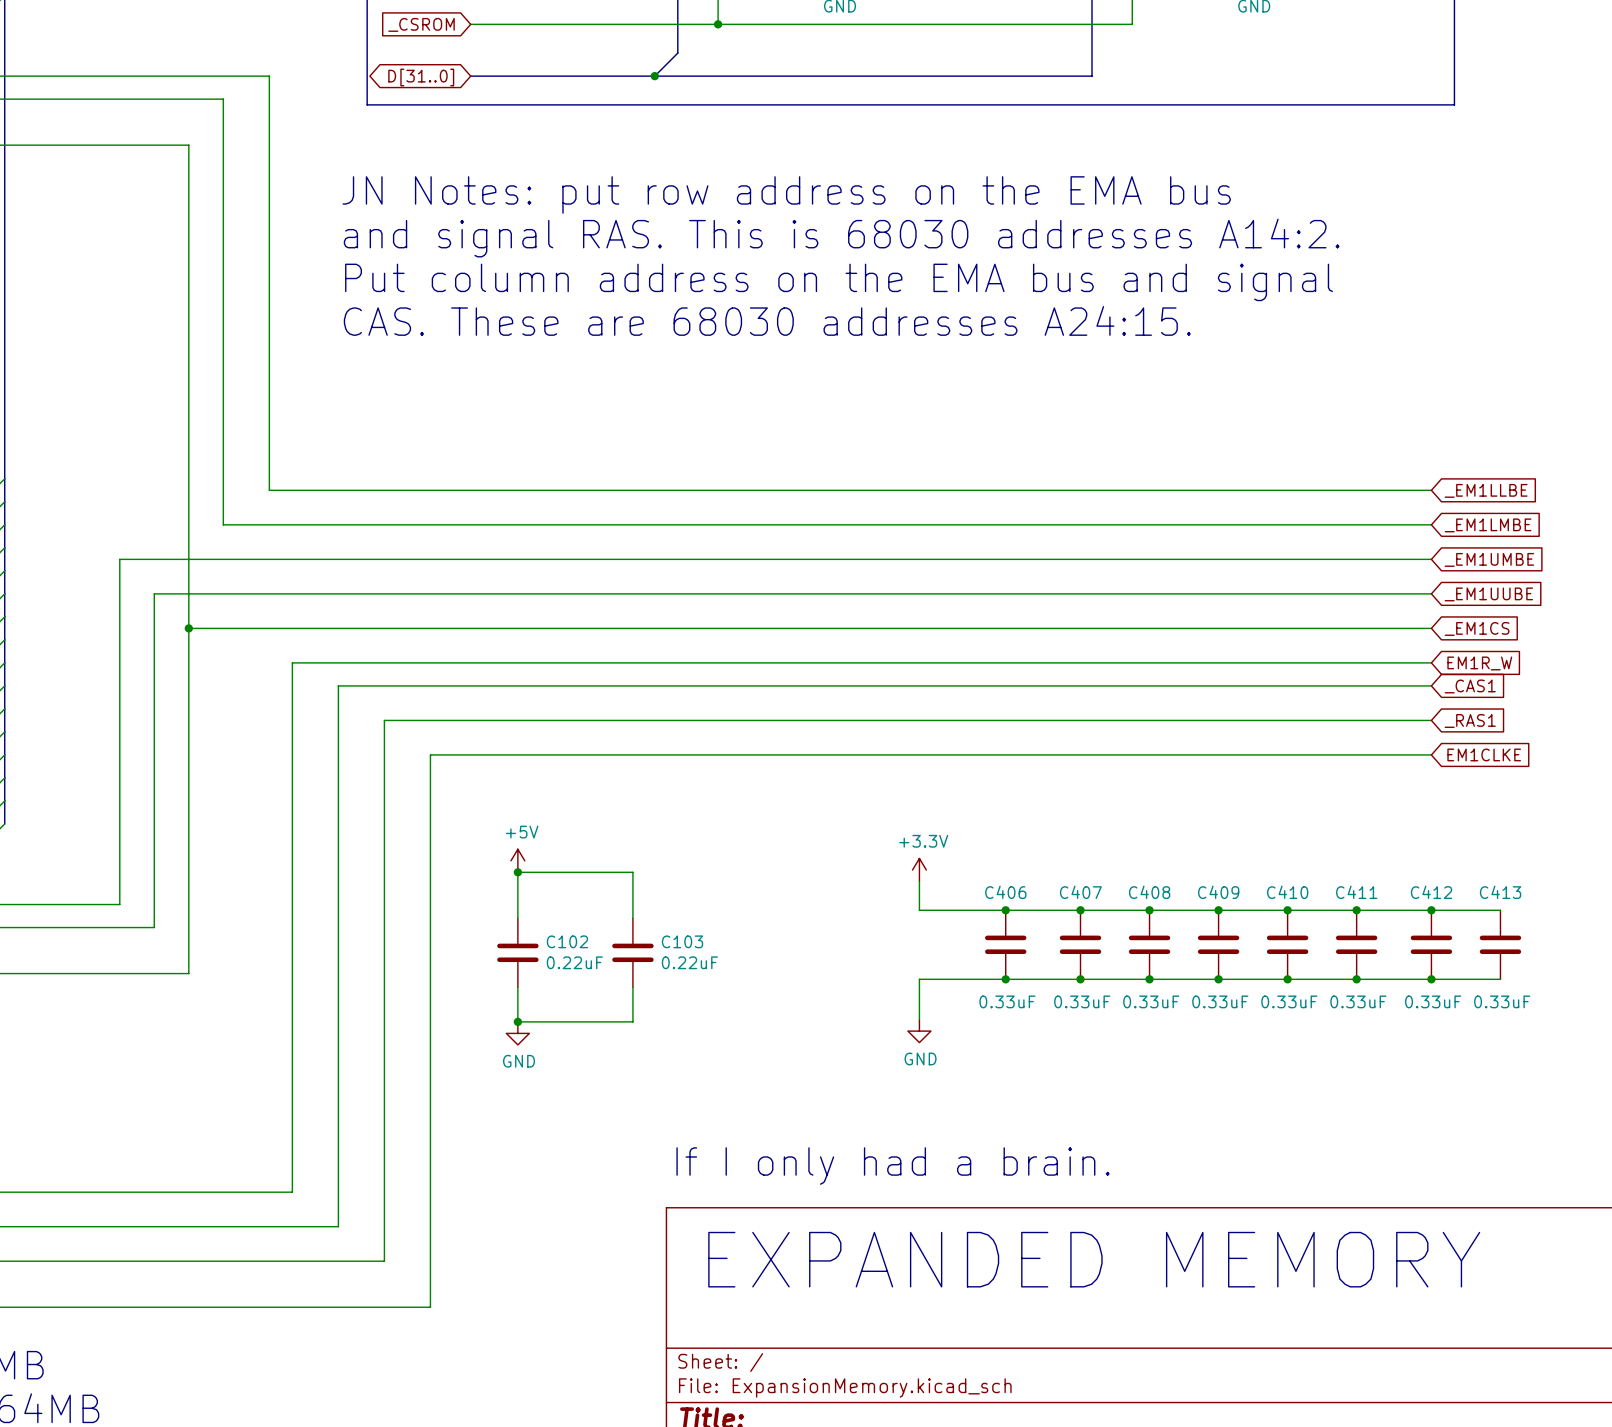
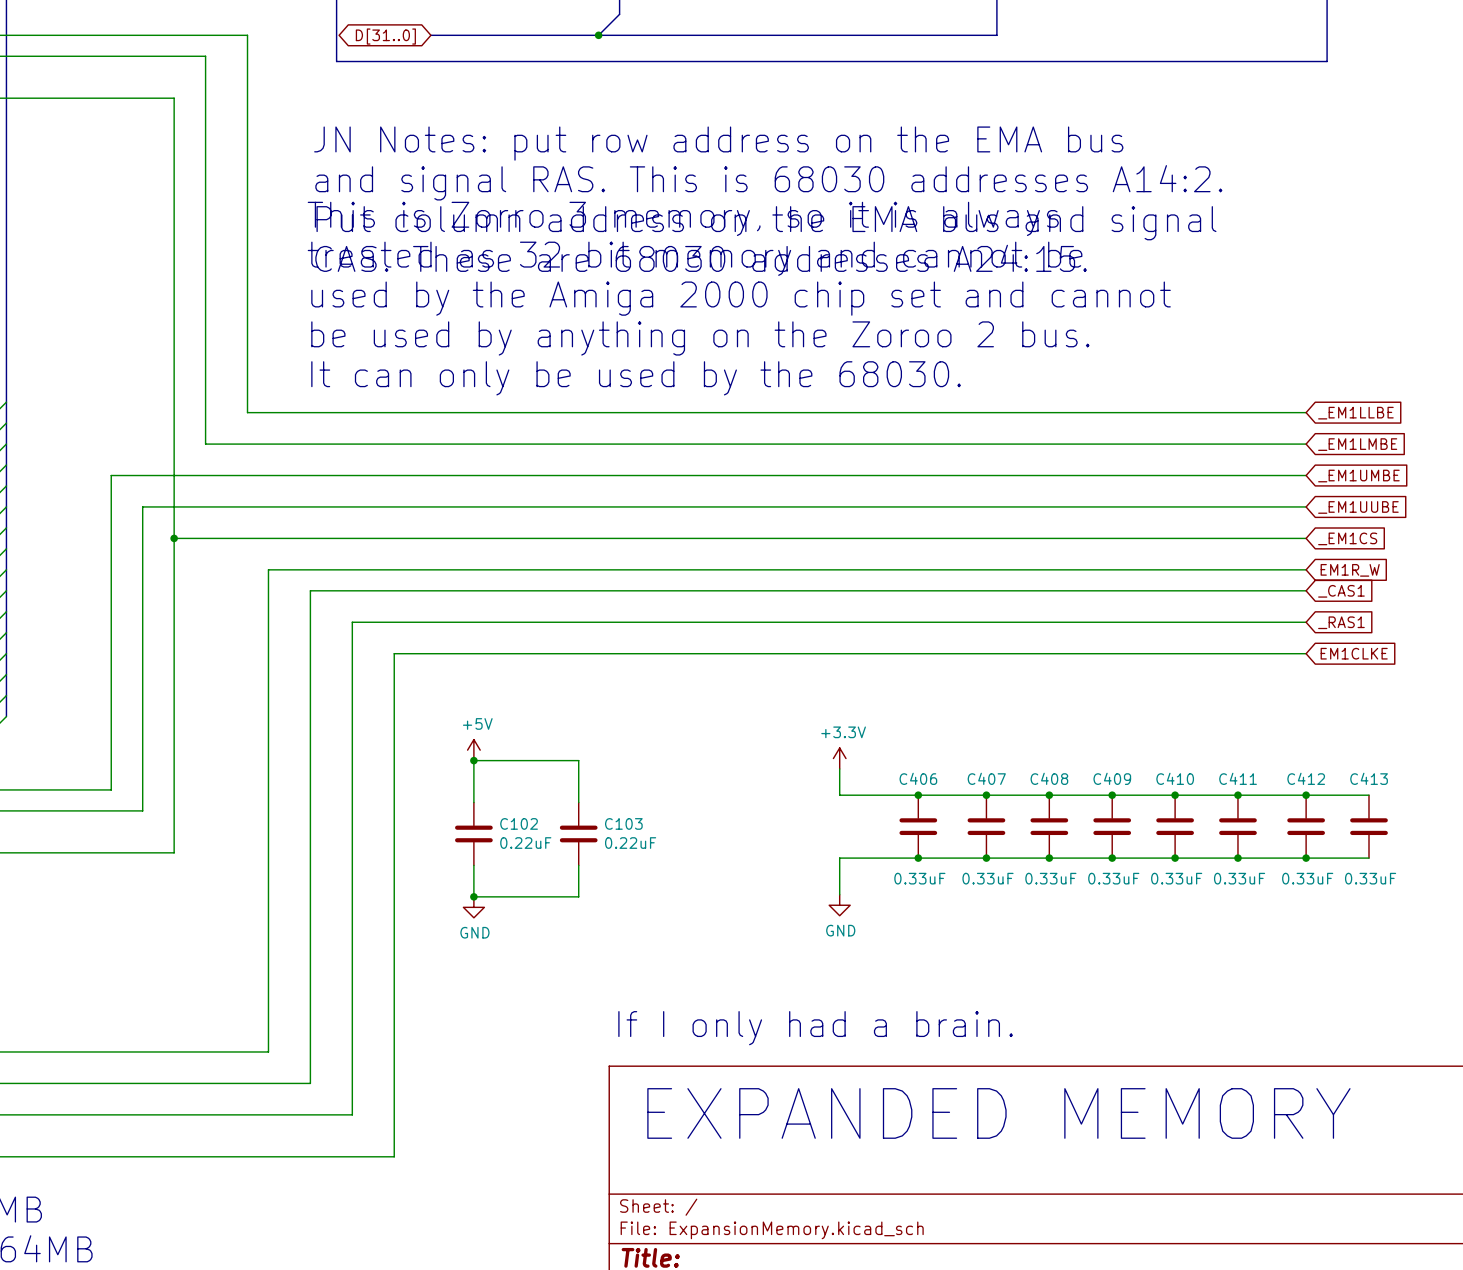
text: none -> This is Zorro 3 memory, so it is always (683, 218)
text: none -> treated as 32 bit memory and cannot be (695, 258)
text: none -> used by the Amiga 2000 chip set and cannot (741, 298)
text: none -> be used by anything on the Zoroo 2 bus. (700, 338)
text: none -> It can only be used by the 68030. (636, 378)

